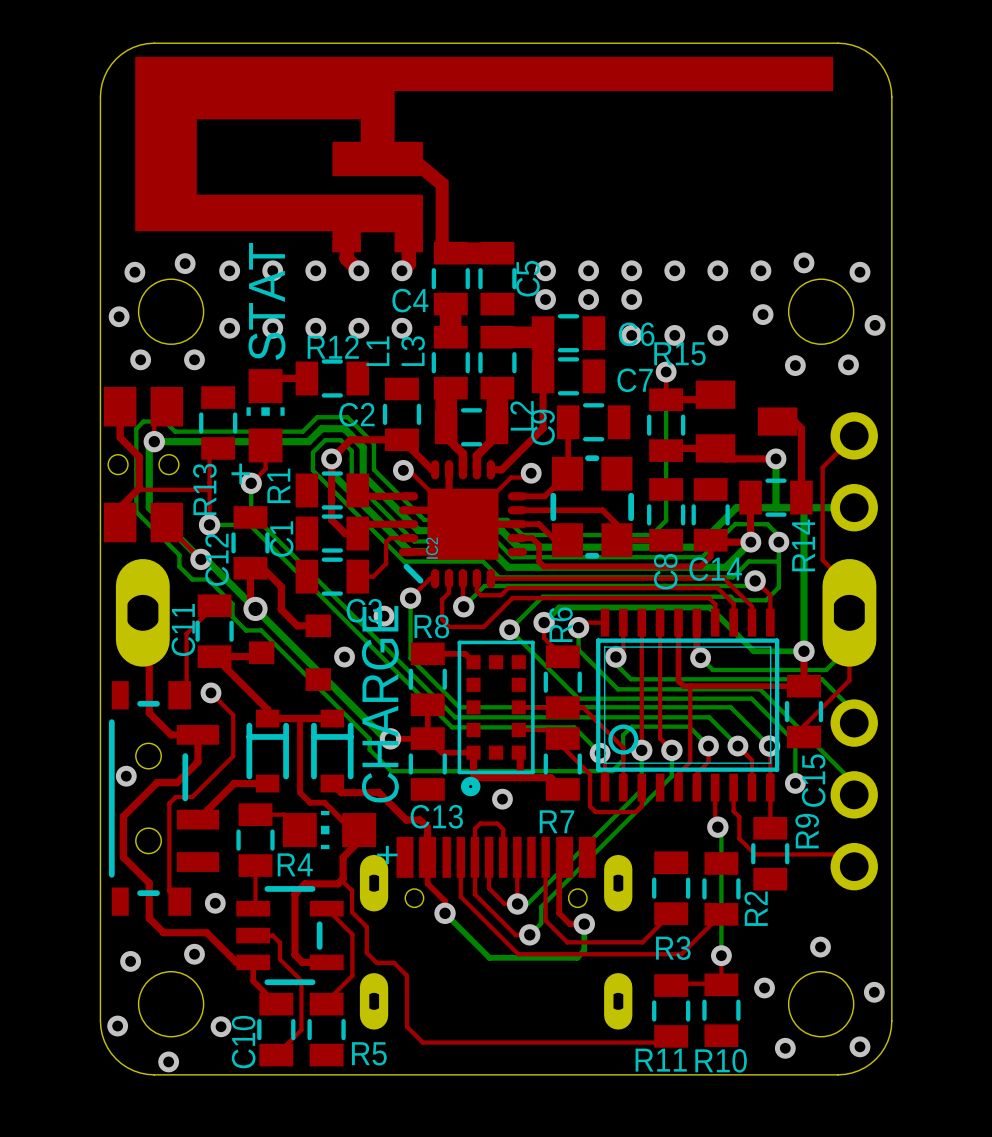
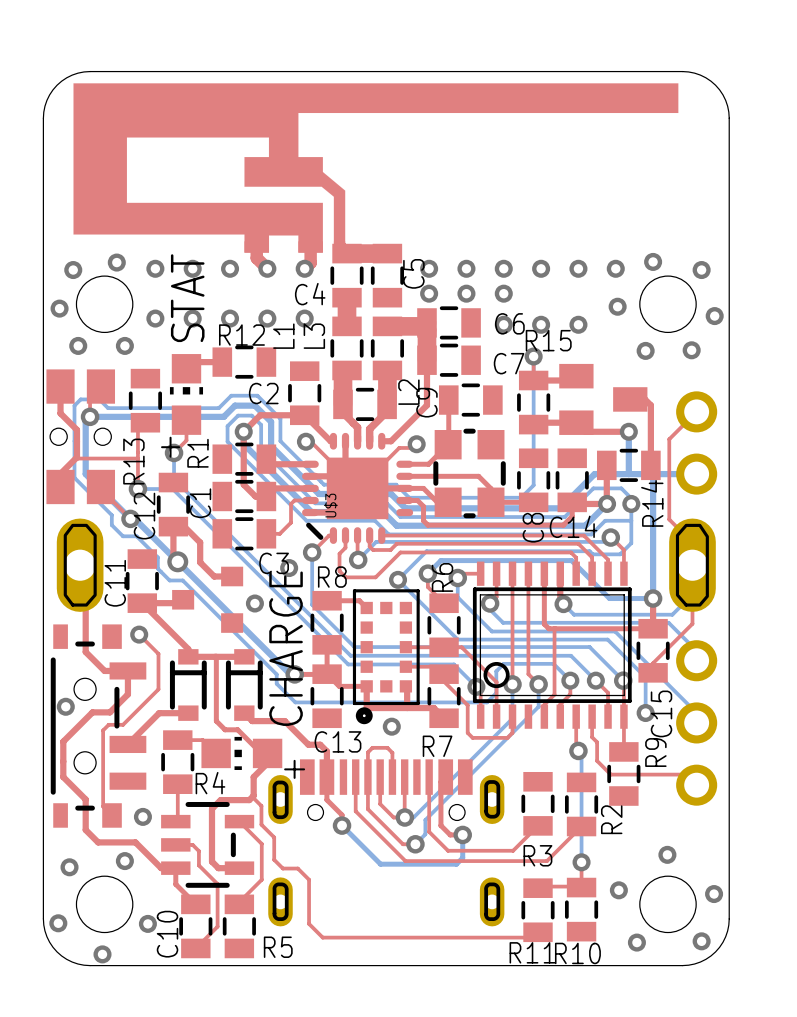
IC2 name: IC2 (432, 548) -> U$3 (330, 505)
top track: (214, 605) (186, 633) (186, 688) (179, 695) -> none

